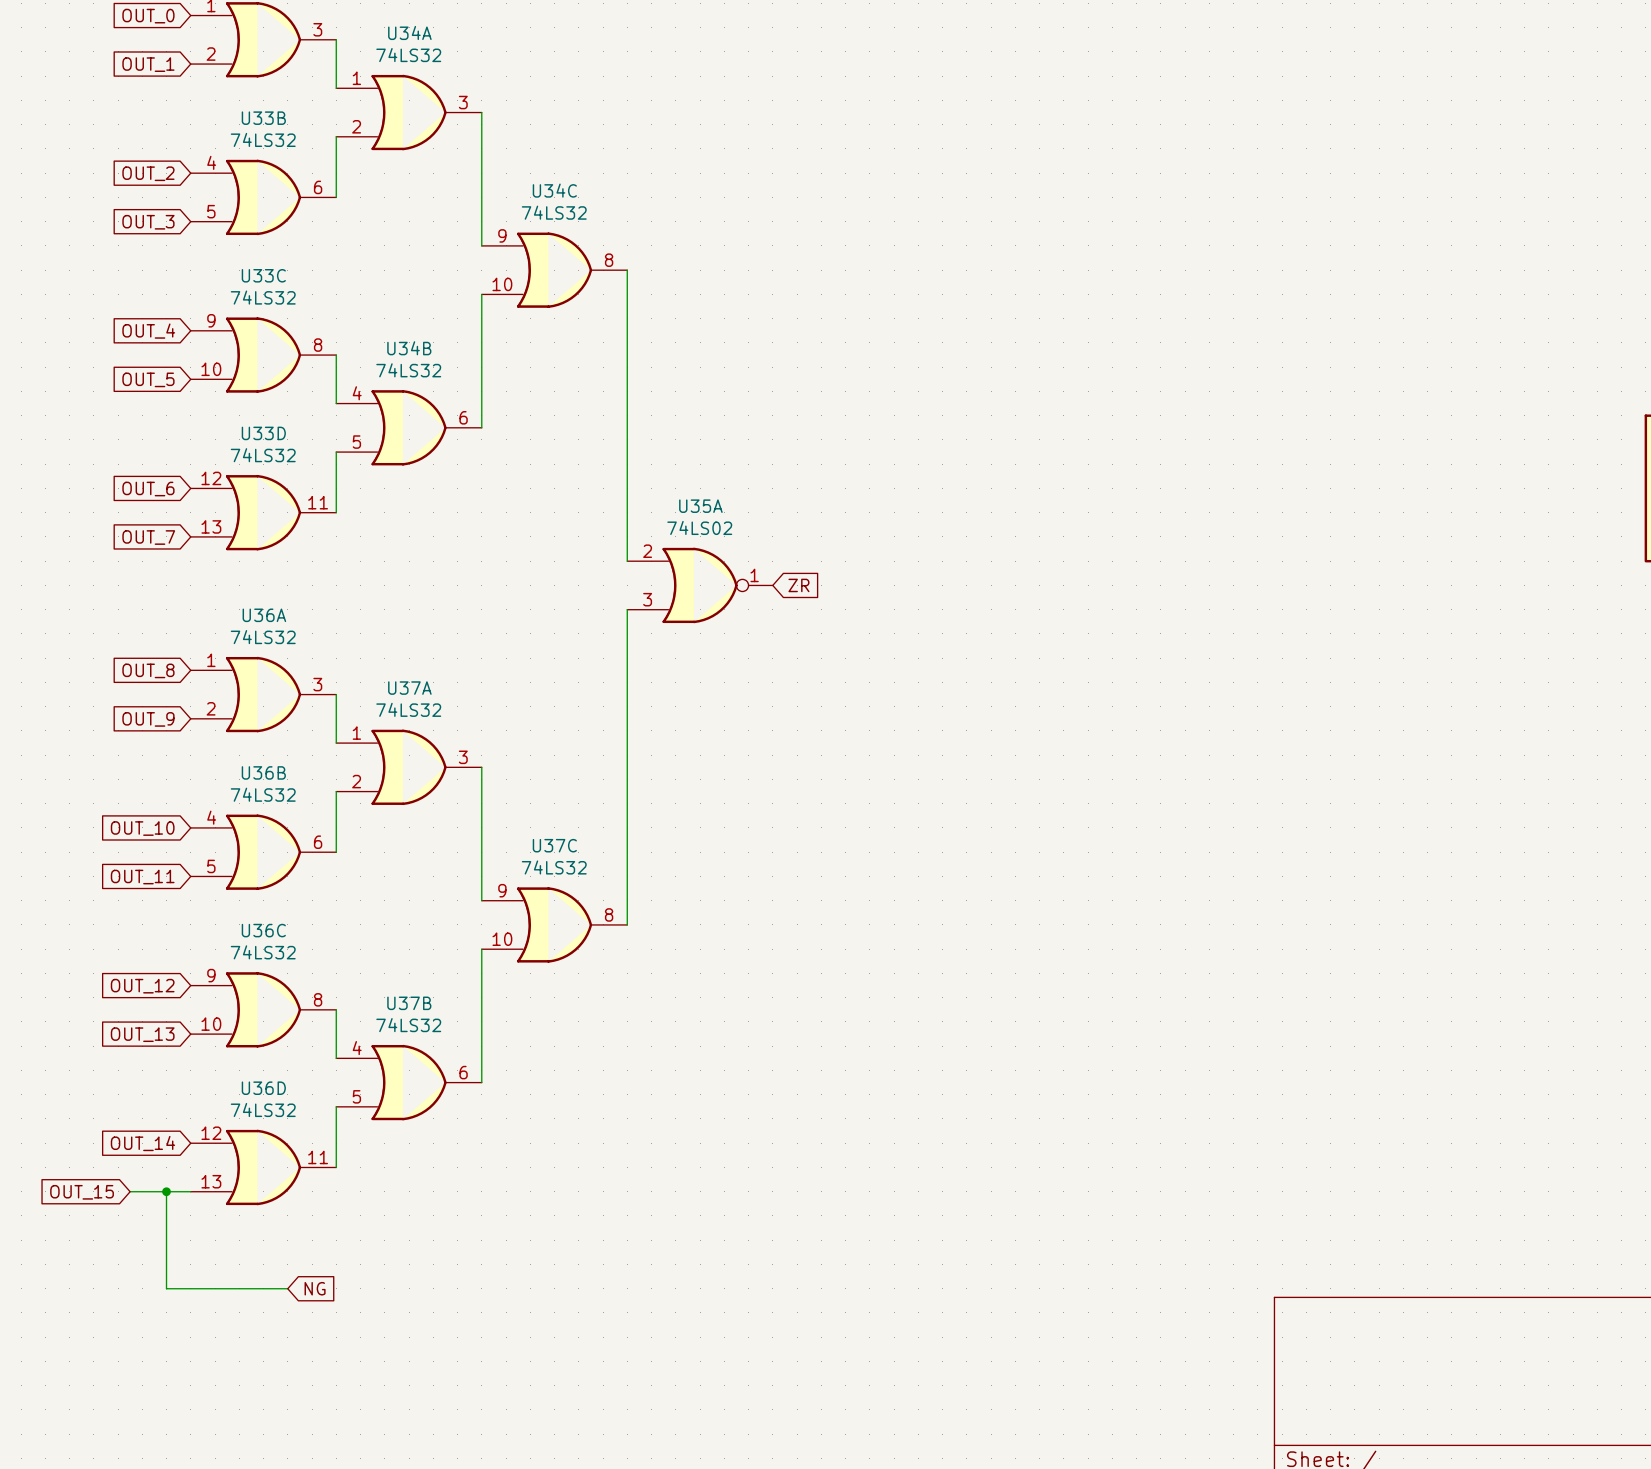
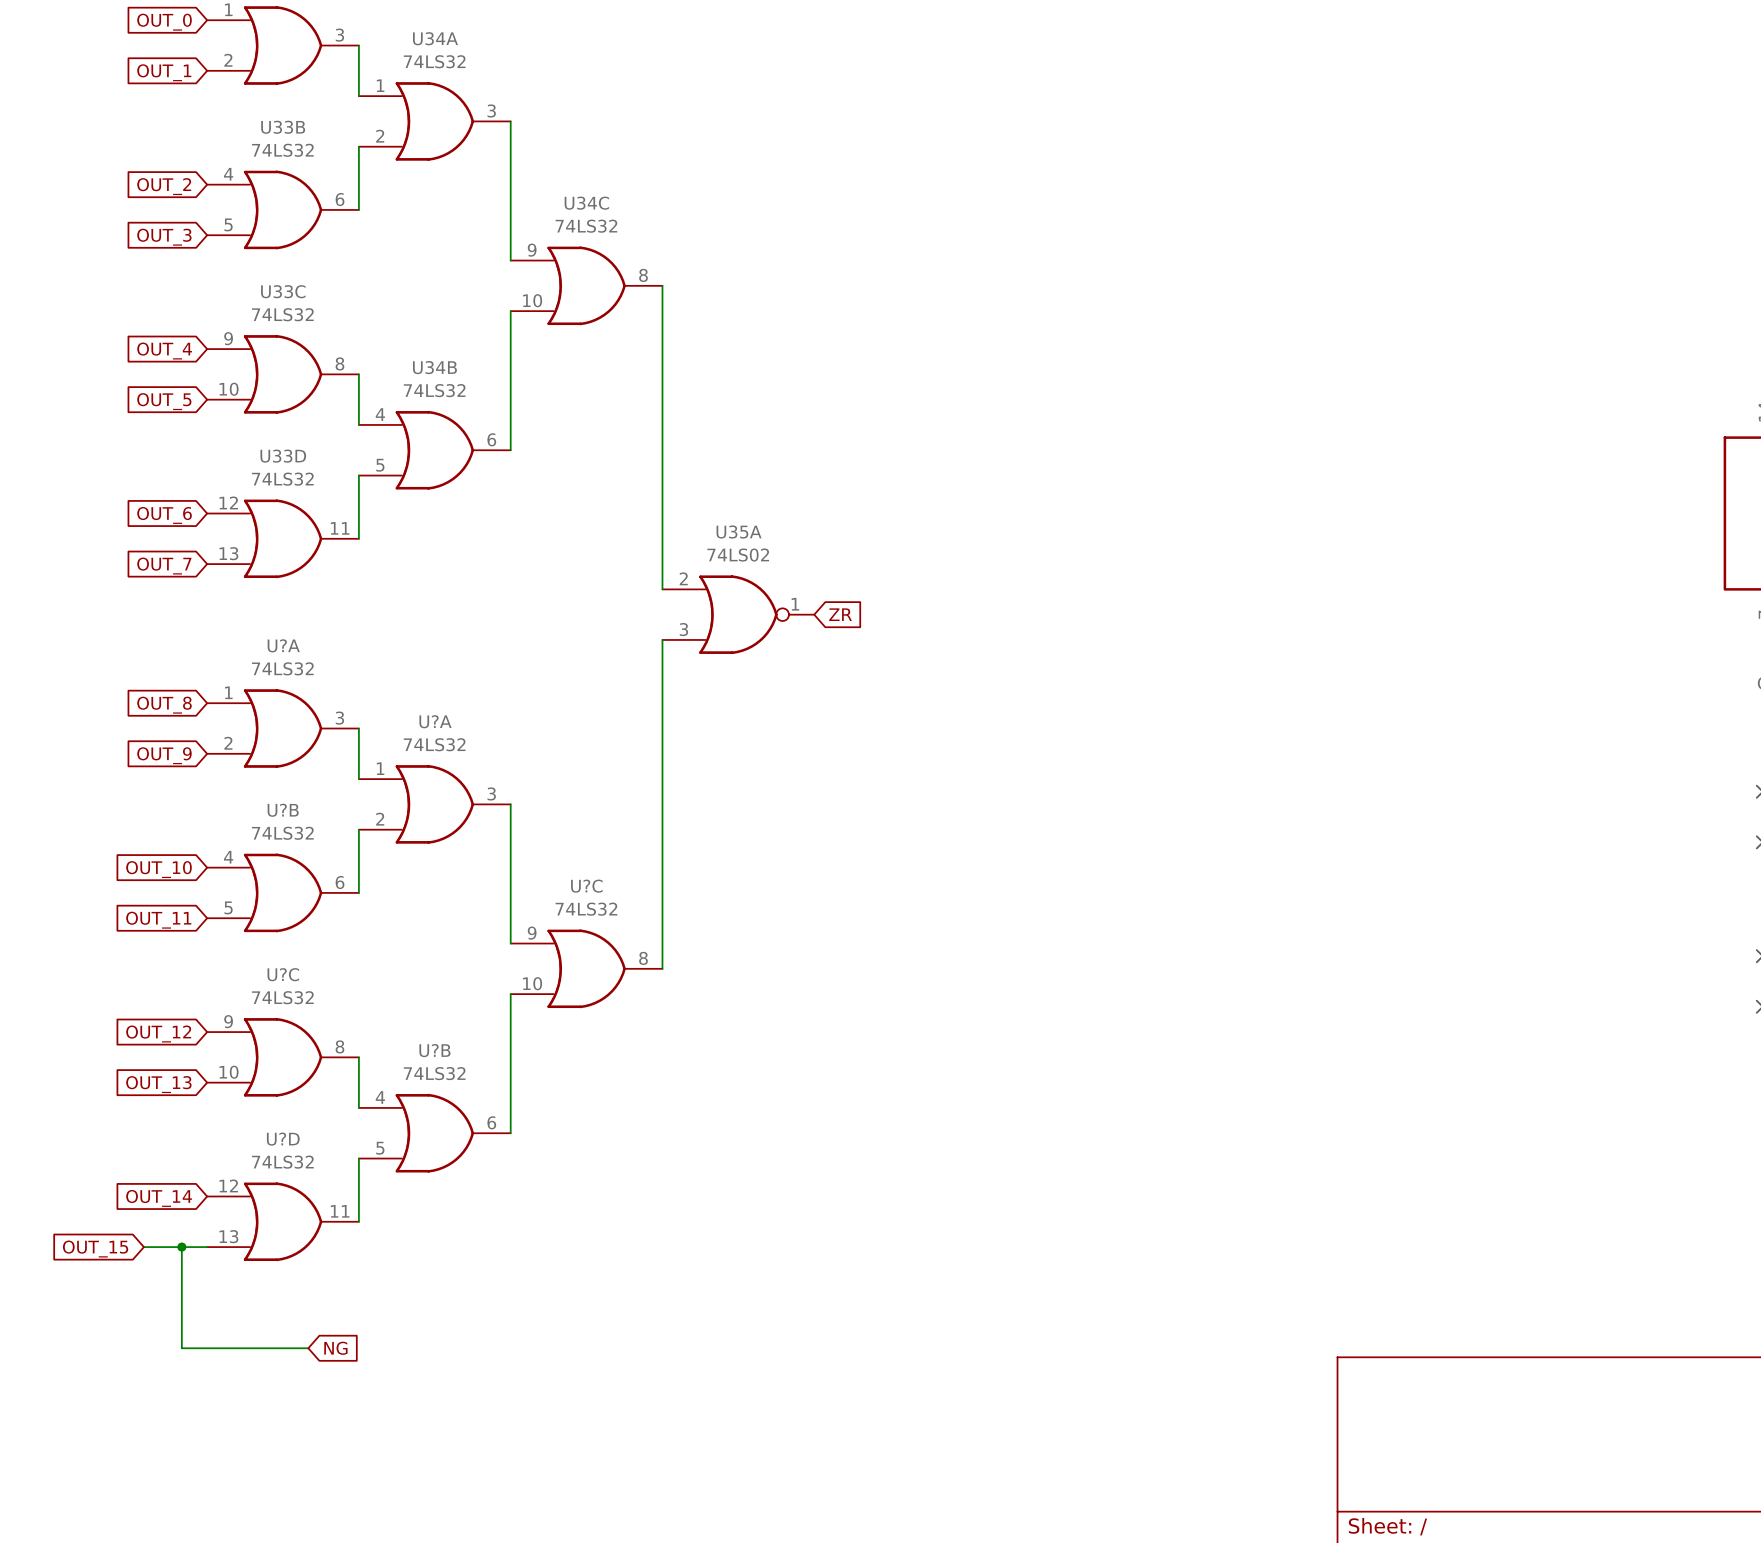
U36A name: U36A (264, 615) -> U?A (283, 645)
U37A name: U37A (409, 688) -> U?A (435, 721)
U36B name: U36B (263, 772) -> U?B (283, 810)
U37C name: U37C (554, 845) -> U?C (586, 886)
U36C name: U36C (263, 930) -> U?C (283, 974)
U37B name: U37B (409, 1003) -> U?B (434, 1050)
U36D name: U36D (263, 1088) -> U?D (283, 1139)

